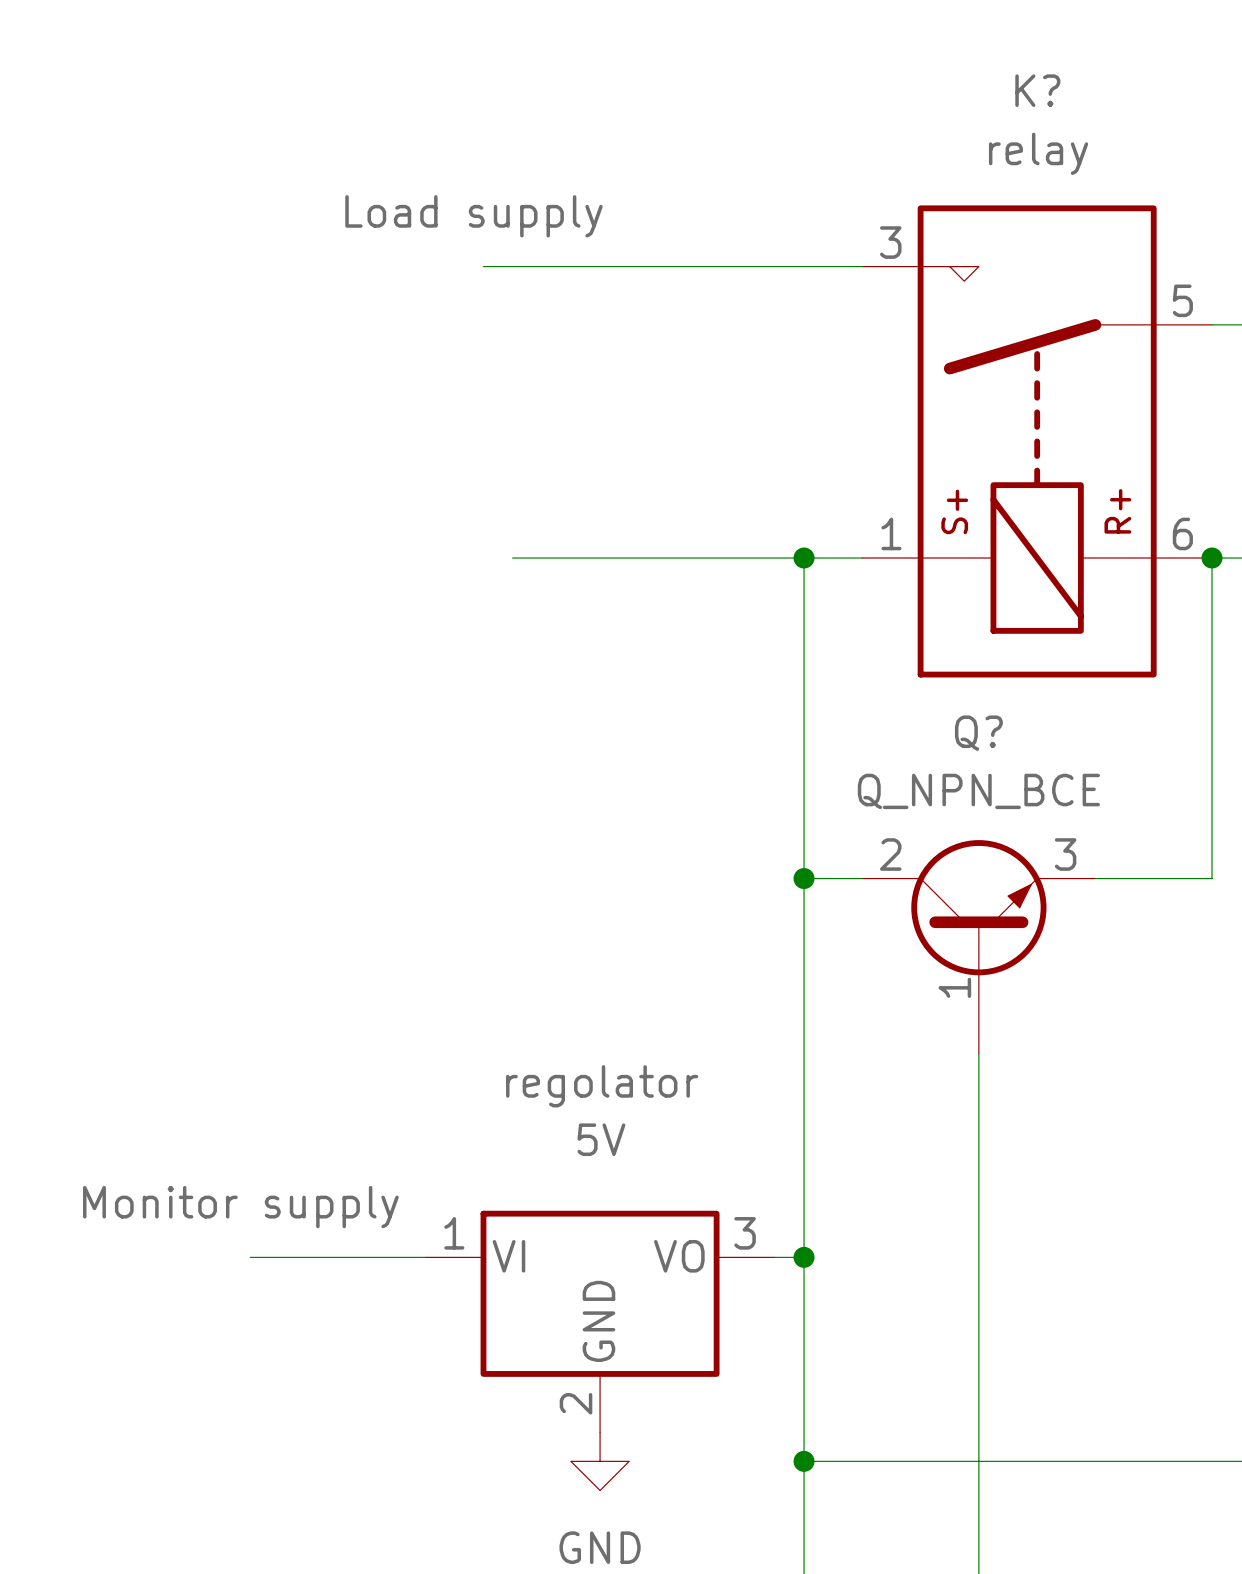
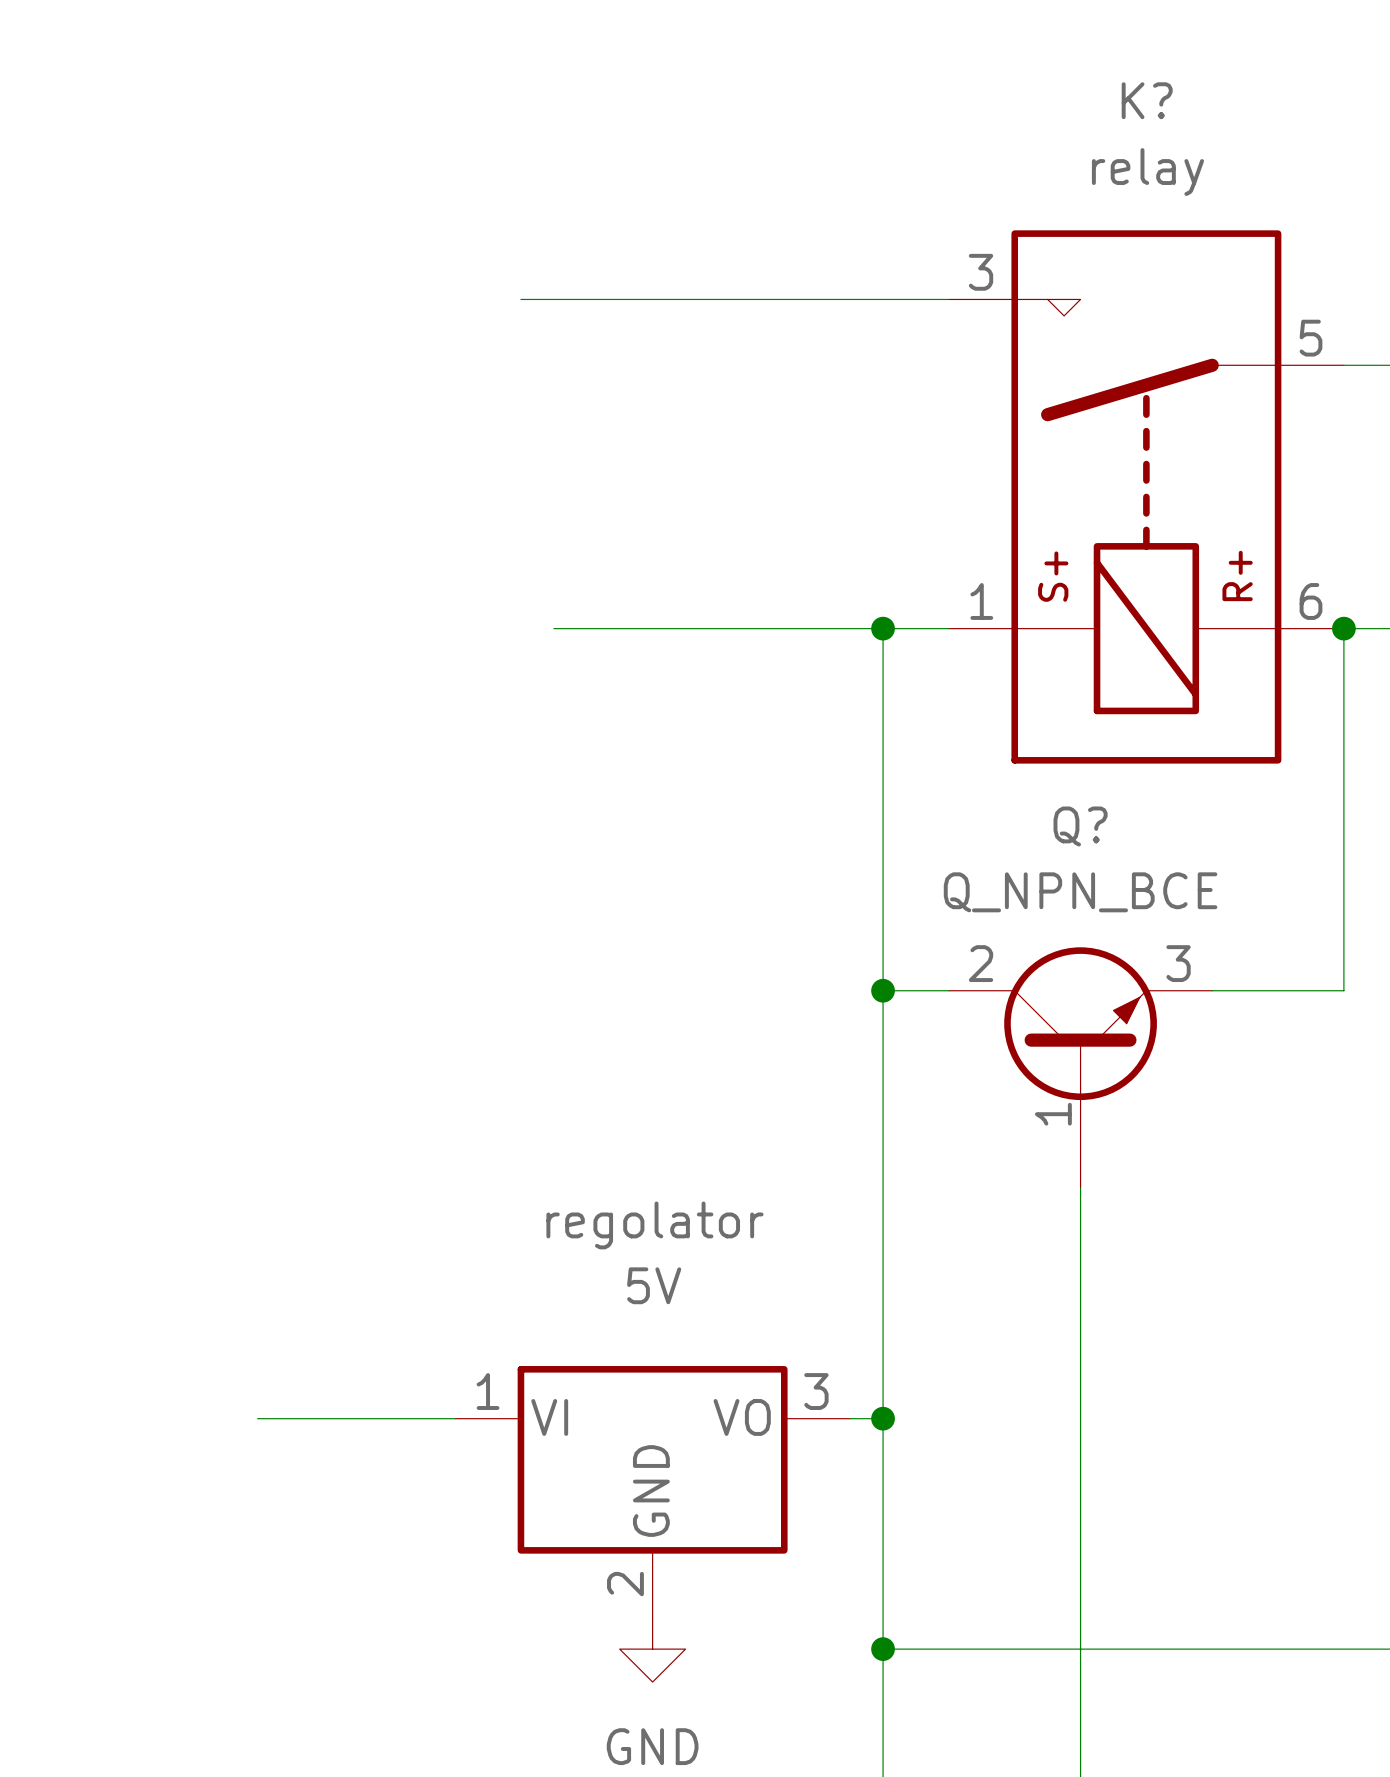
label: Load supply (473, 216) -> none
label: Monitor supply (240, 1207) -> none

